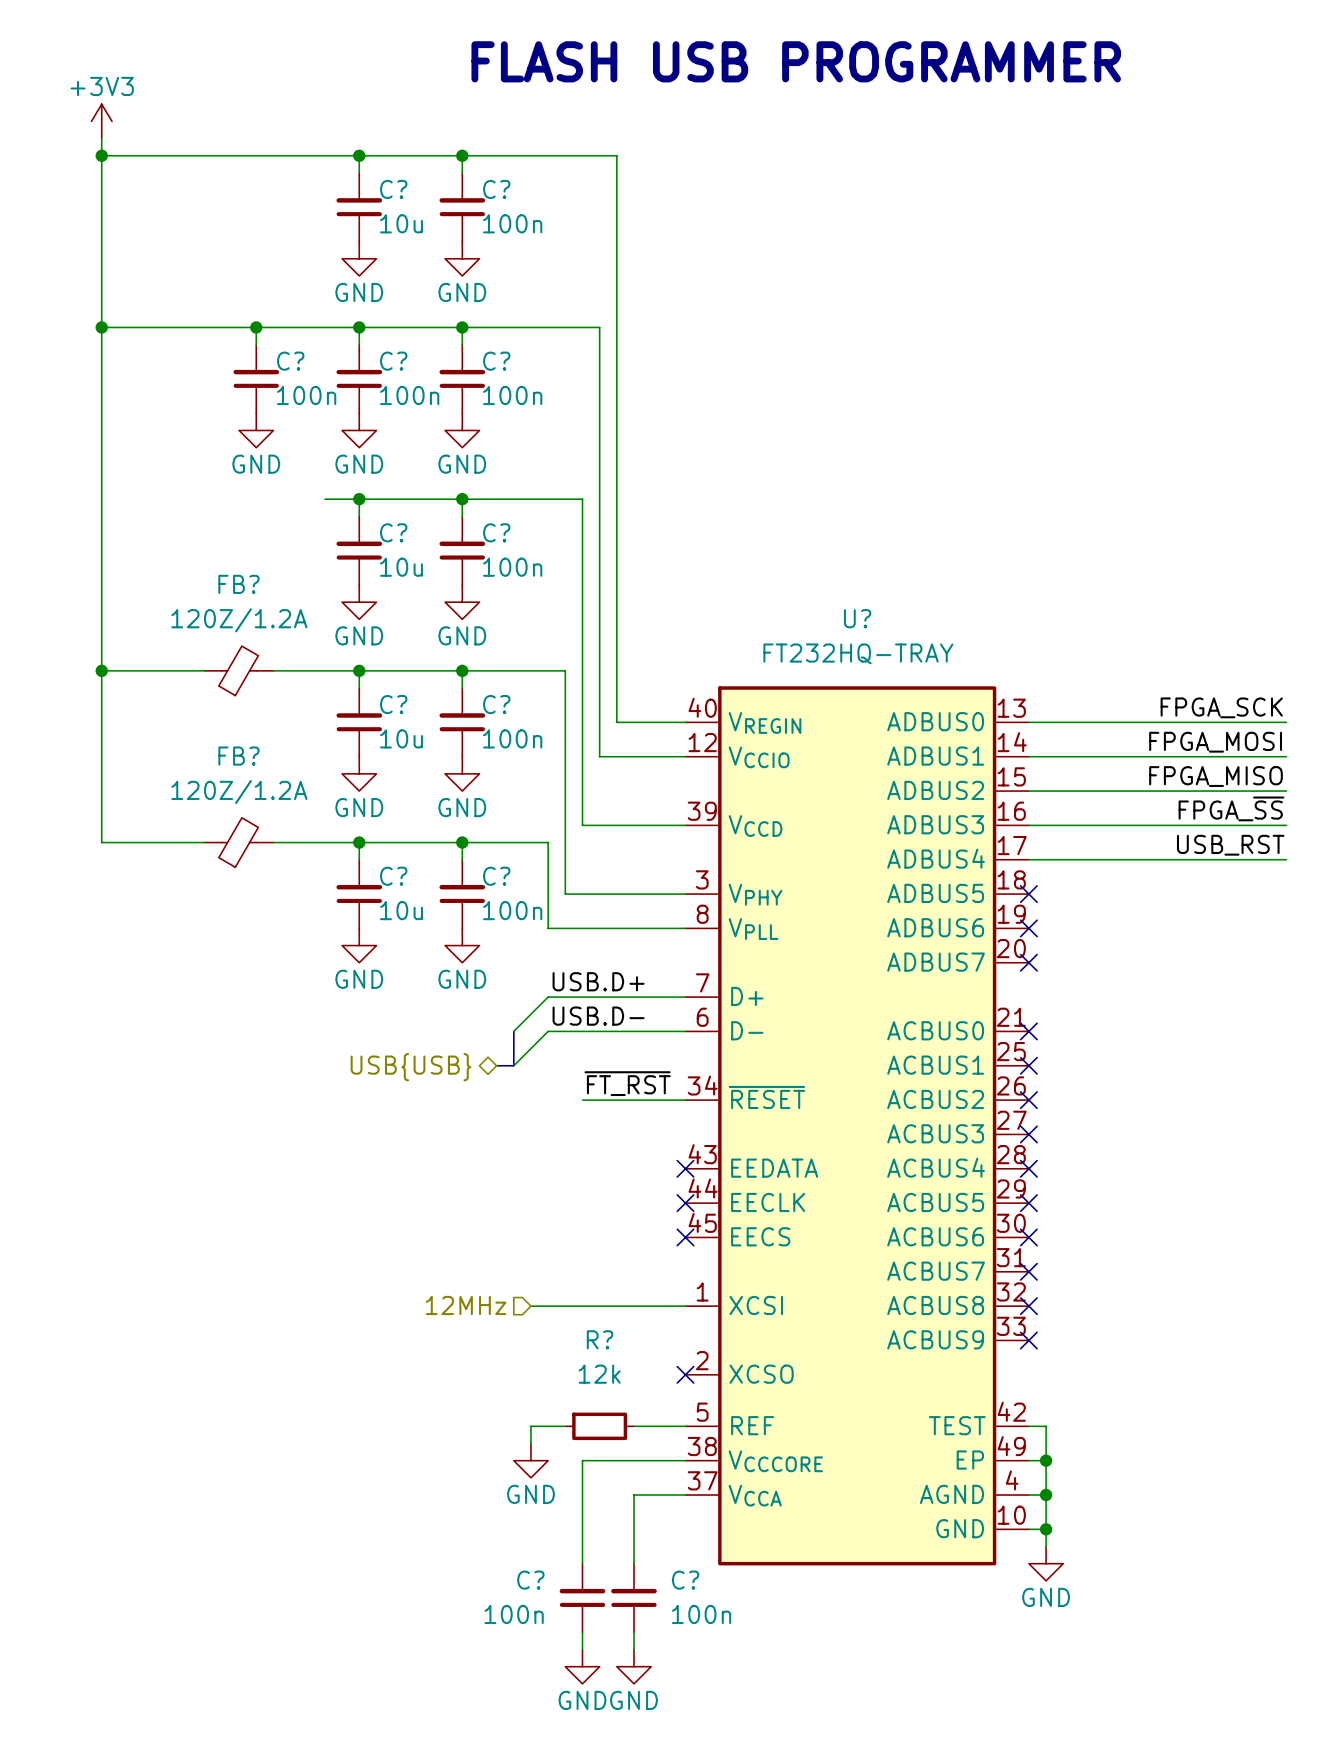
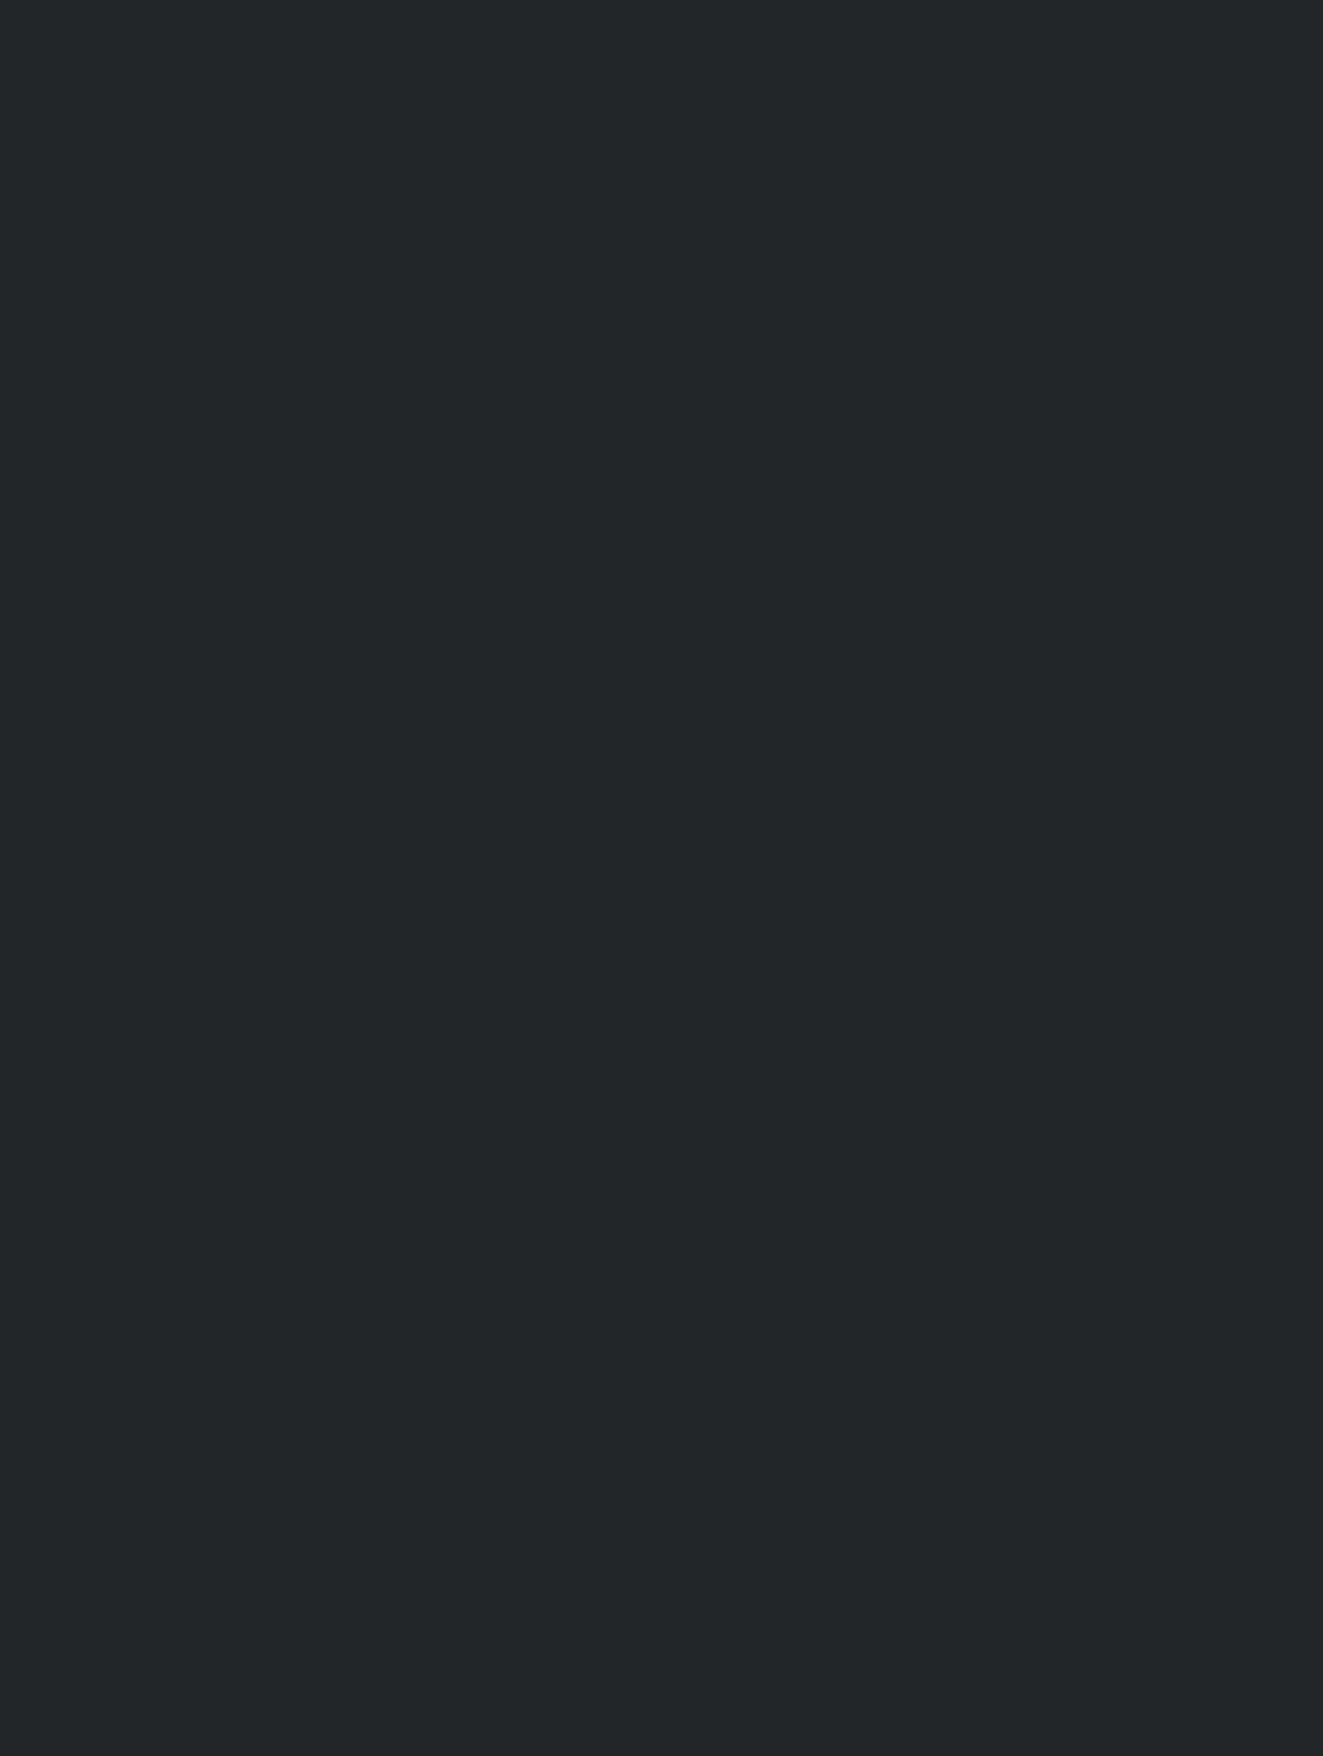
text: FLASH USB PROGRAMMER (796, 61) -> none
power symbol: +3V3 (101, 121) -> none
wire: (101, 138) (101, 842) (204, 842) -> none
wire: (101, 155) (616, 155) (616, 722) (685, 722) -> none
junction: (101, 155) -> none
wire: (359, 155) (359, 172) -> none
junction: (359, 155) -> none
wire: (462, 155) (462, 172) -> none
junction: (462, 155) -> none
C?: (359, 207) -> none
C?: (462, 207) -> none
power symbol: GND (359, 258) -> none
power symbol: GND (462, 258) -> none
wire: (101, 327) (599, 327) (599, 756) (685, 756) -> none
junction: (101, 327) -> none
wire: (256, 327) (256, 344) -> none
junction: (256, 327) -> none
wire: (359, 327) (359, 344) -> none
junction: (359, 327) -> none
wire: (462, 327) (462, 344) -> none
junction: (462, 327) -> none
C?: (256, 378) -> none
C?: (359, 378) -> none
C?: (462, 378) -> none
power symbol: GND (256, 430) -> none
power symbol: GND (359, 430) -> none
power symbol: GND (462, 430) -> none
wire: (324, 499) (582, 499) (582, 825) (685, 825) -> none
wire: (359, 499) (359, 516) -> none
junction: (359, 499) -> none
wire: (462, 499) (462, 516) -> none
junction: (462, 499) -> none
C?: (359, 550) -> none
C?: (462, 550) -> none
power symbol: GND (359, 602) -> none
power symbol: GND (462, 602) -> none
wire: (101, 670) (204, 670) -> none
junction: (101, 670) -> none
FB?: (239, 670) -> none
wire: (273, 670) (565, 670) (565, 894) (685, 894) -> none
wire: (359, 670) (359, 688) -> none
junction: (359, 670) -> none
wire: (462, 670) (462, 688) -> none
junction: (462, 670) -> none
label: FPGA_SCK (1221, 707) -> none
C?: (359, 722) -> none
C?: (462, 722) -> none
wire: (1028, 722) (1286, 722) -> none
label: FPGA_MOSI (1215, 742) -> none
wire: (1028, 756) (1286, 756) -> none
power symbol: GND (359, 773) -> none
power symbol: GND (462, 773) -> none
label: FPGA_MISO (1216, 776) -> none
wire: (1028, 791) (1286, 791) -> none
label: FPGA_~{SS} (1231, 808) -> none
wire: (1028, 825) (1286, 825) -> none
FB?: (239, 842) -> none
wire: (273, 842) (548, 842) (548, 928) (685, 928) -> none
wire: (359, 842) (359, 859) -> none
junction: (359, 842) -> none
wire: (462, 842) (462, 859) -> none
junction: (462, 842) -> none
label: USB_RST (1230, 845) -> none
wire: (1028, 859) (1286, 859) -> none
C?: (359, 894) -> none
C?: (462, 894) -> none
no-connect mark: (1028, 894) -> none
no-connect mark: (1028, 928) -> none
power symbol: GND (359, 945) -> none
power symbol: GND (462, 945) -> none
no-connect mark: (1028, 962) -> none
label: USB.D+ (598, 981) -> none
wire: (685, 997) (548, 997) (513, 1031) -> none
label: USB.D- (598, 1016) -> none
bus: (513, 1031) (513, 1065) (496, 1065) -> none
wire: (685, 1031) (548, 1031) (513, 1065) -> none
no-connect mark: (1028, 1031) -> none
no-connect mark: (1028, 1065) -> none
hierarchical label: USB{USB} (410, 1067) -> none
label: ~{FT_RST} (627, 1083) -> none
wire: (582, 1100) (685, 1100) -> none
no-connect mark: (1028, 1100) -> none
U?: (857, 1125) -> none
no-connect mark: (1028, 1134) -> none
no-connect mark: (685, 1168) -> none
no-connect mark: (1028, 1168) -> none
no-connect mark: (685, 1203) -> none
no-connect mark: (1028, 1203) -> none
no-connect mark: (685, 1237) -> none
no-connect mark: (1028, 1237) -> none
no-connect mark: (1028, 1271) -> none
hierarchical label: 12MHz (466, 1305) -> none
wire: (530, 1306) (685, 1306) -> none
no-connect mark: (1028, 1306) -> none
no-connect mark: (1028, 1340) -> none
no-connect mark: (685, 1374) -> none
wire: (565, 1426) (530, 1426) (530, 1443) -> none
R?: (599, 1426) -> none
wire: (633, 1426) (685, 1426) -> none
wire: (1028, 1426) (1046, 1426) (1046, 1546) -> none
power symbol: GND (530, 1460) -> none
wire: (685, 1460) (582, 1460) (582, 1563) -> none
wire: (1028, 1460) (1046, 1460) -> none
junction: (1046, 1460) -> none
wire: (685, 1495) (633, 1495) (633, 1563) -> none
wire: (1028, 1495) (1046, 1495) -> none
junction: (1046, 1495) -> none
wire: (1028, 1529) (1046, 1529) -> none
junction: (1046, 1529) -> none
power symbol: GND (1046, 1563) -> none
C?: (582, 1598) -> none
C?: (633, 1598) -> none
wire: (582, 1632) (582, 1649) -> none
wire: (633, 1632) (633, 1649) -> none
power symbol: GND (582, 1666) -> none
power symbol: GND (633, 1666) -> none

